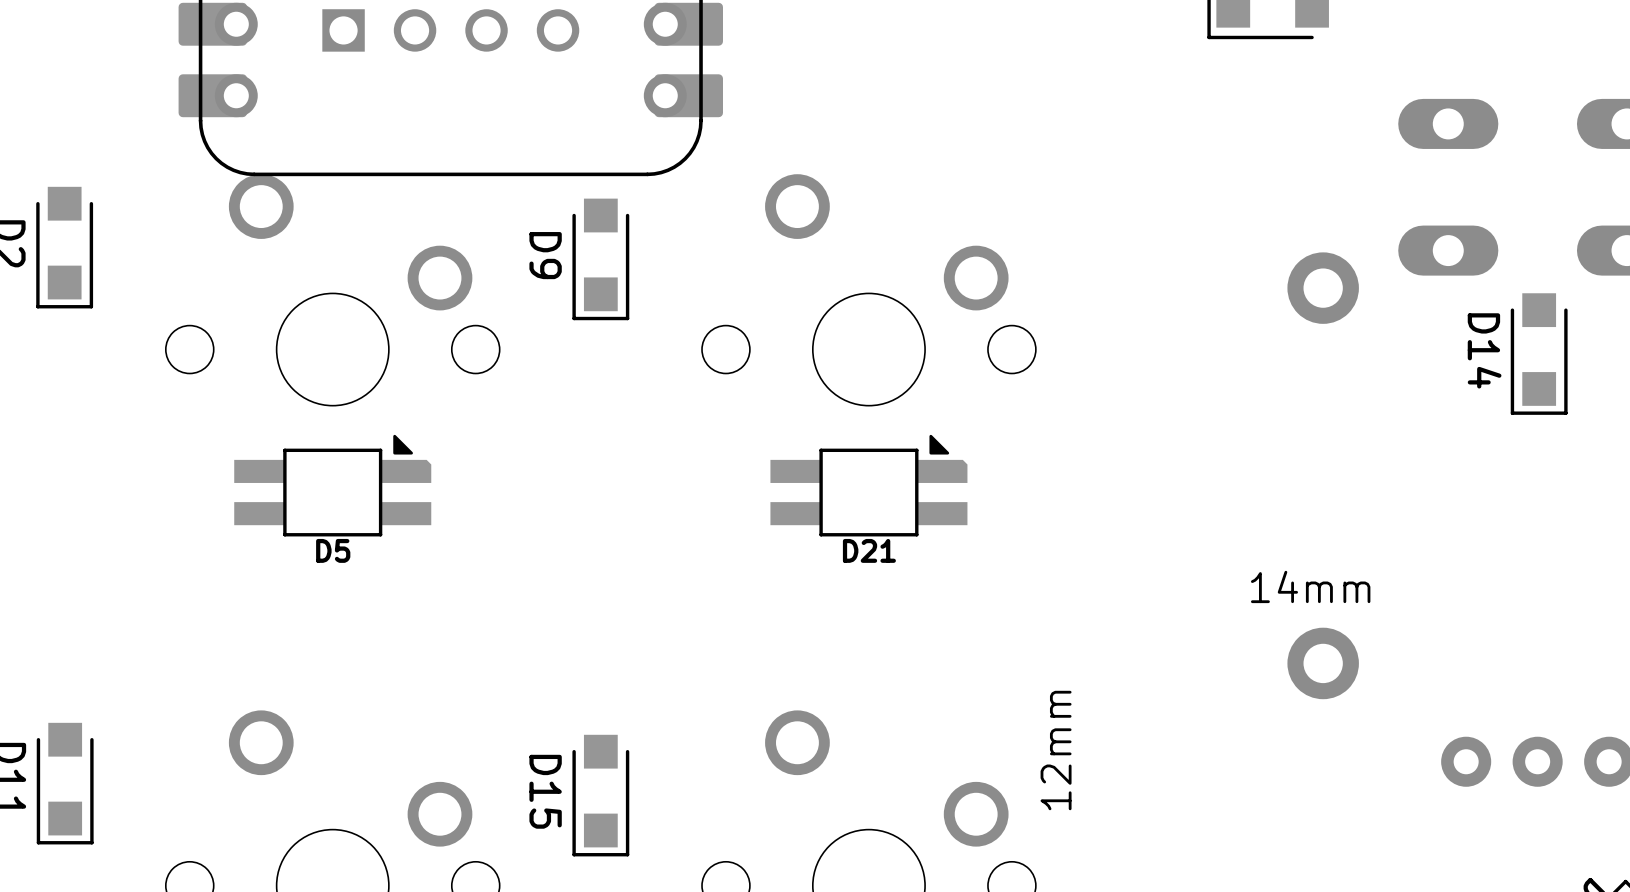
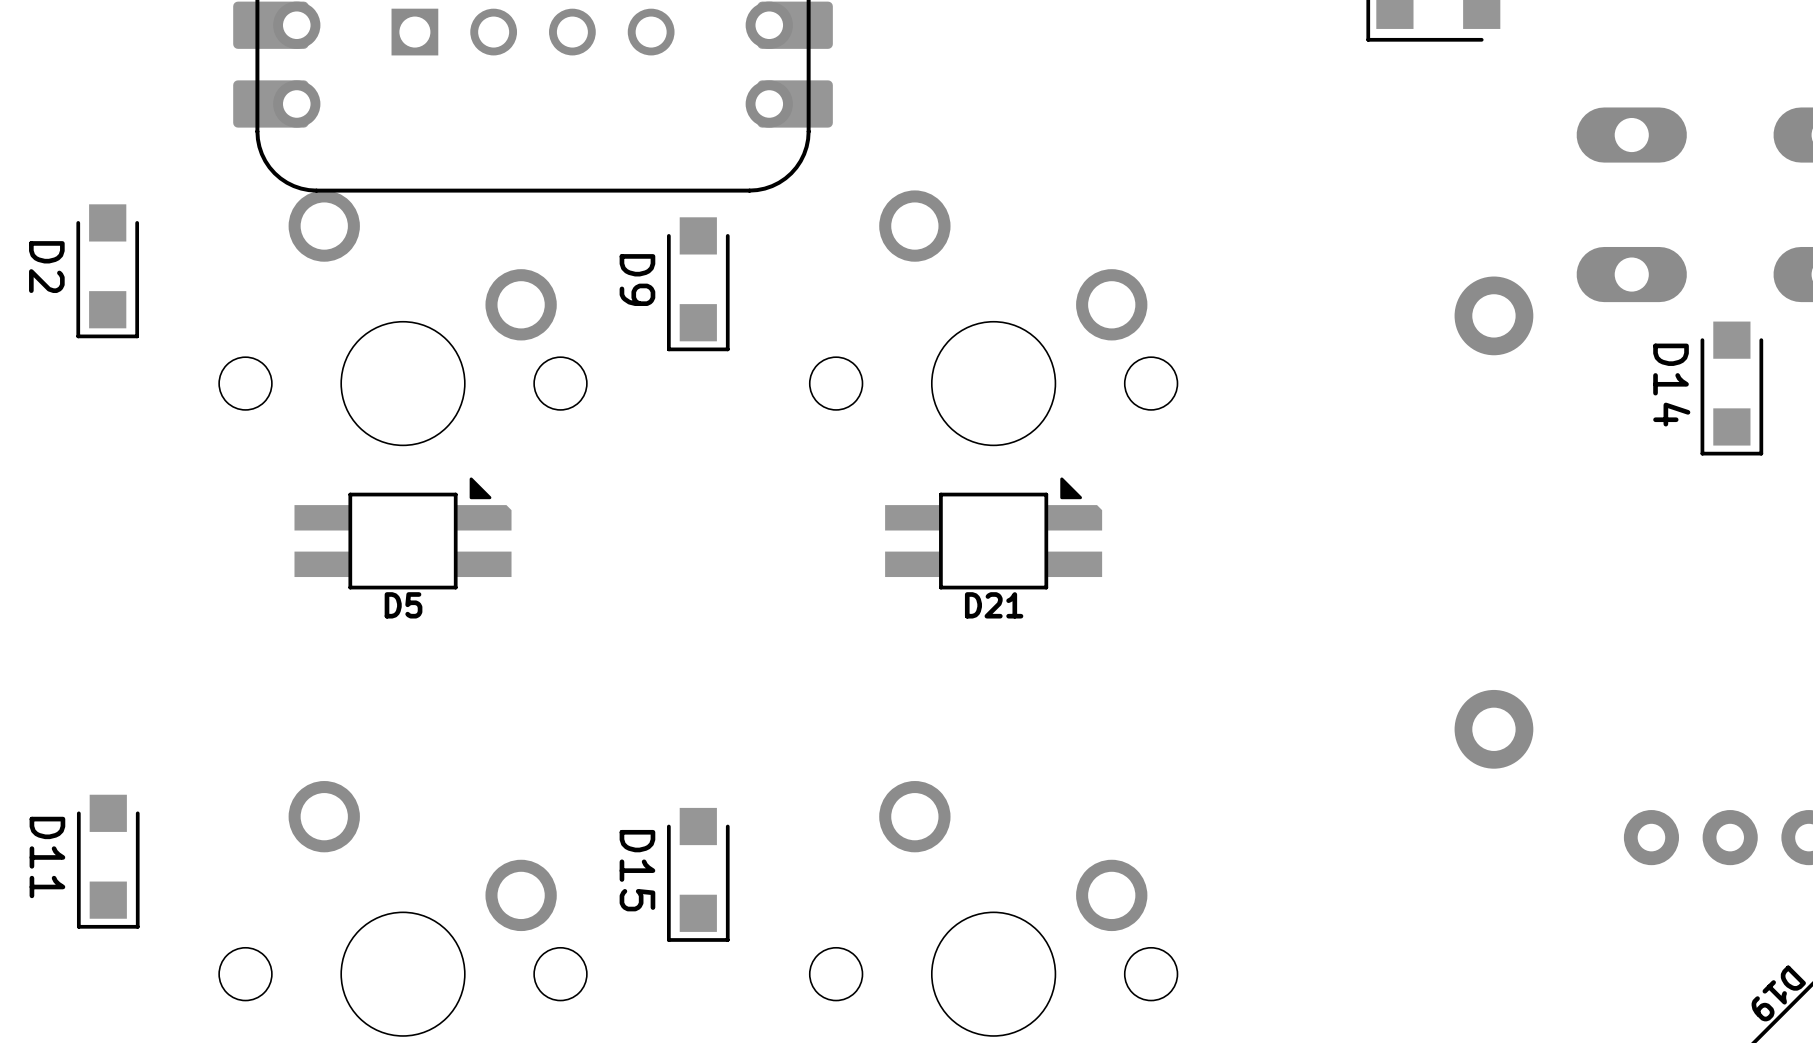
text: 14mm (1310, 586) -> none
text: 12mm (1056, 750) -> none

